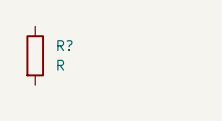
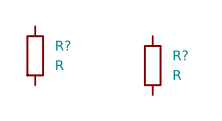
R?: none -> R (152, 65)

